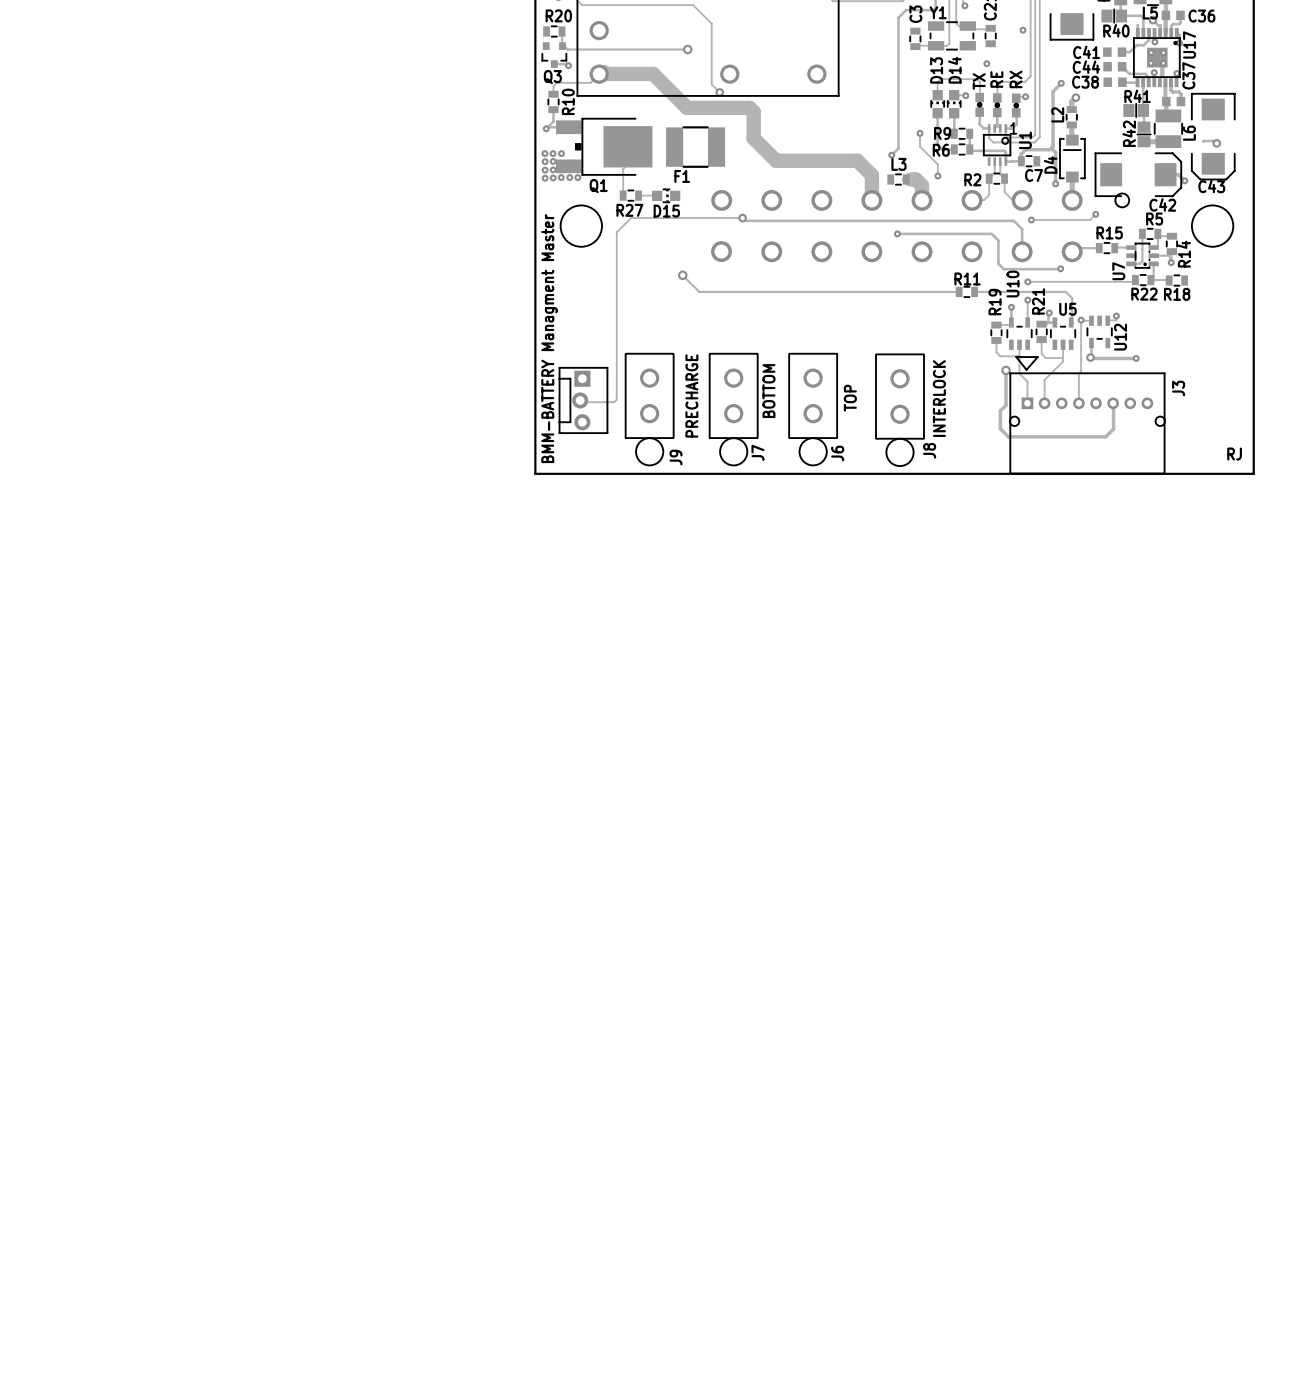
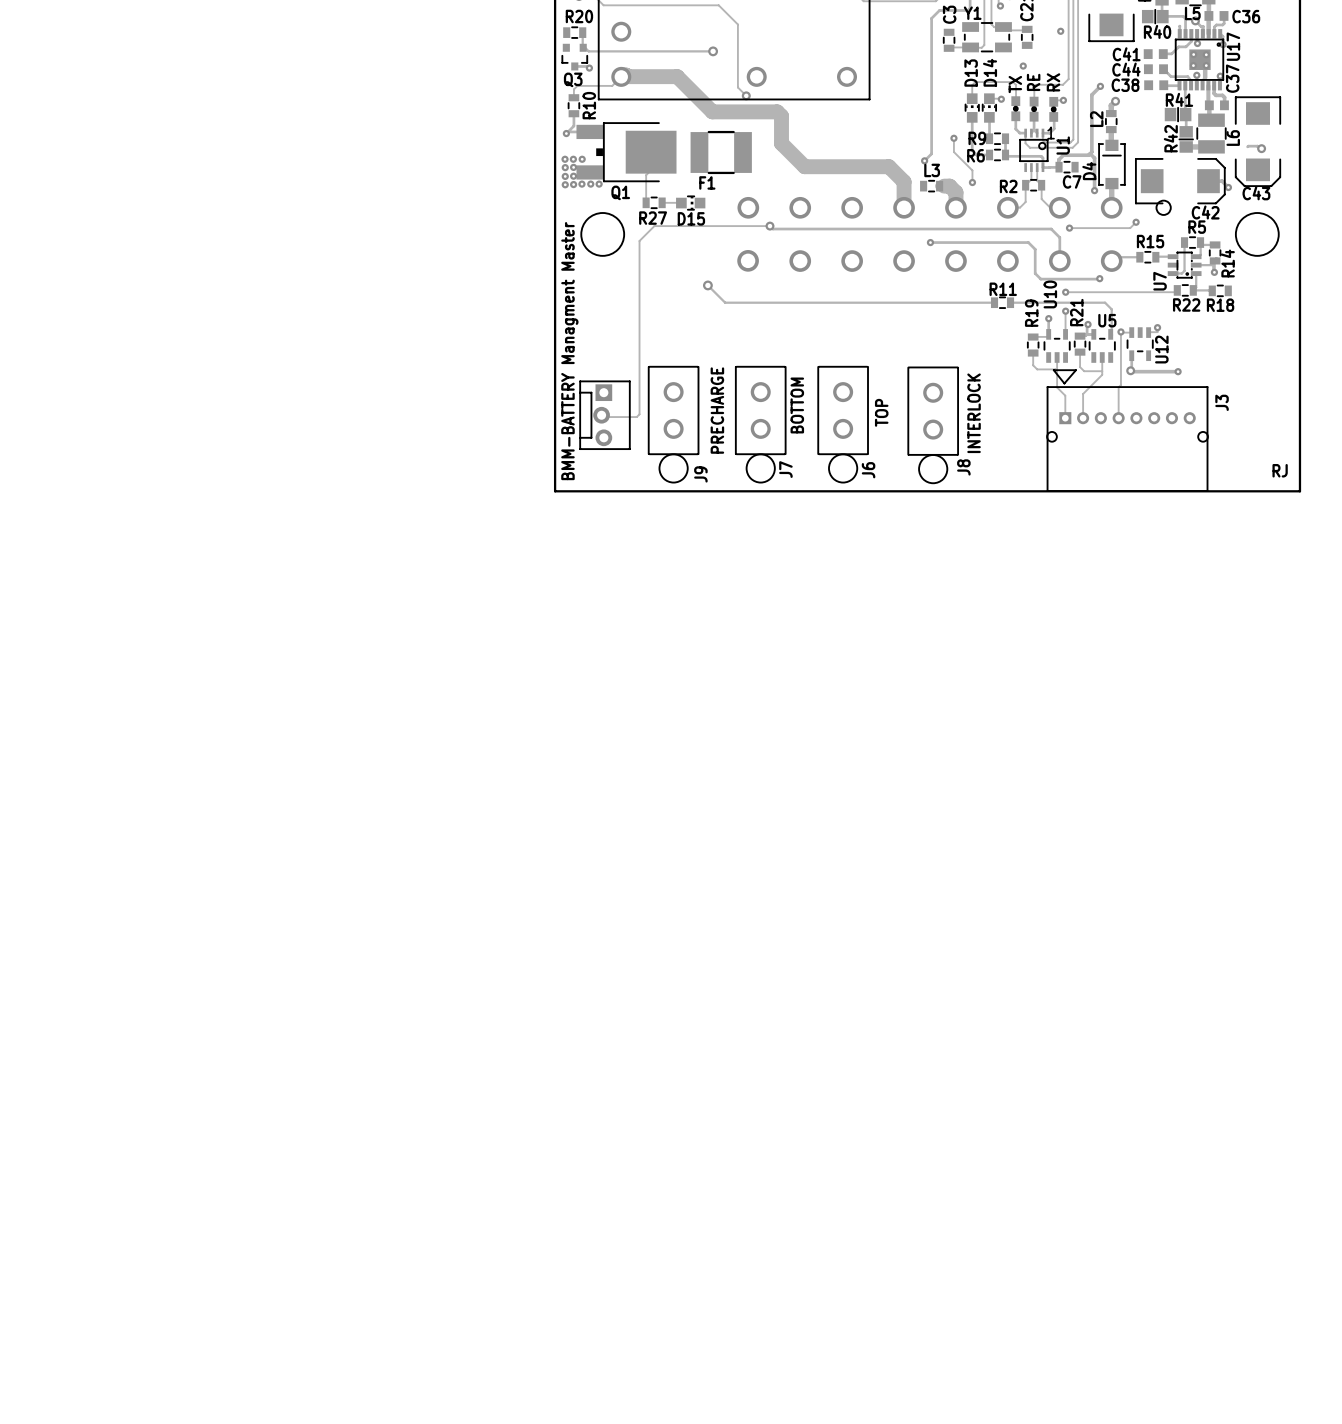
track: (1006, 370) (1006, 405) (1000, 410) (1000, 428) (1008, 436) (1105, 436) (1113, 428) (1113, 403) -> none
via: (1006, 370) -> none

